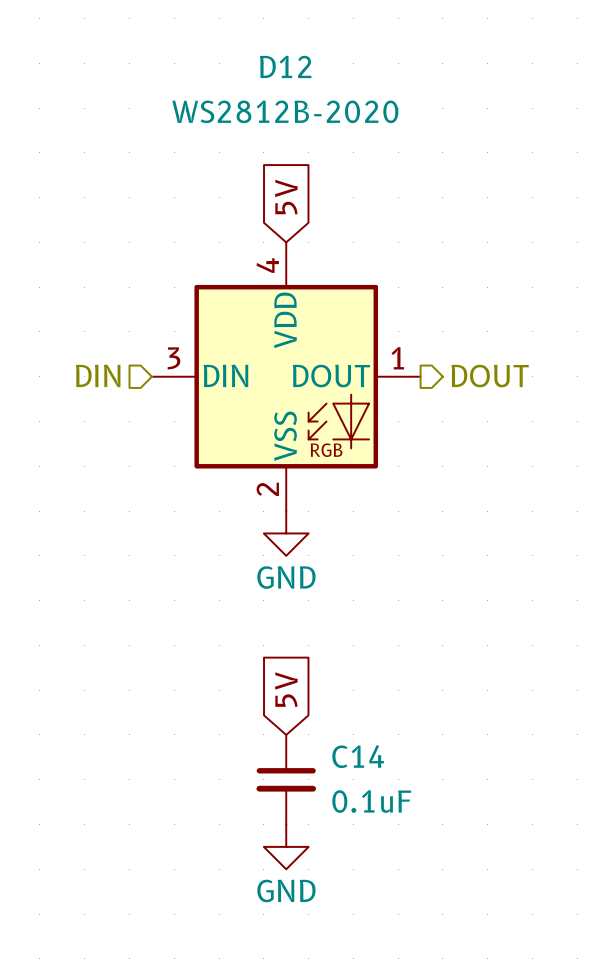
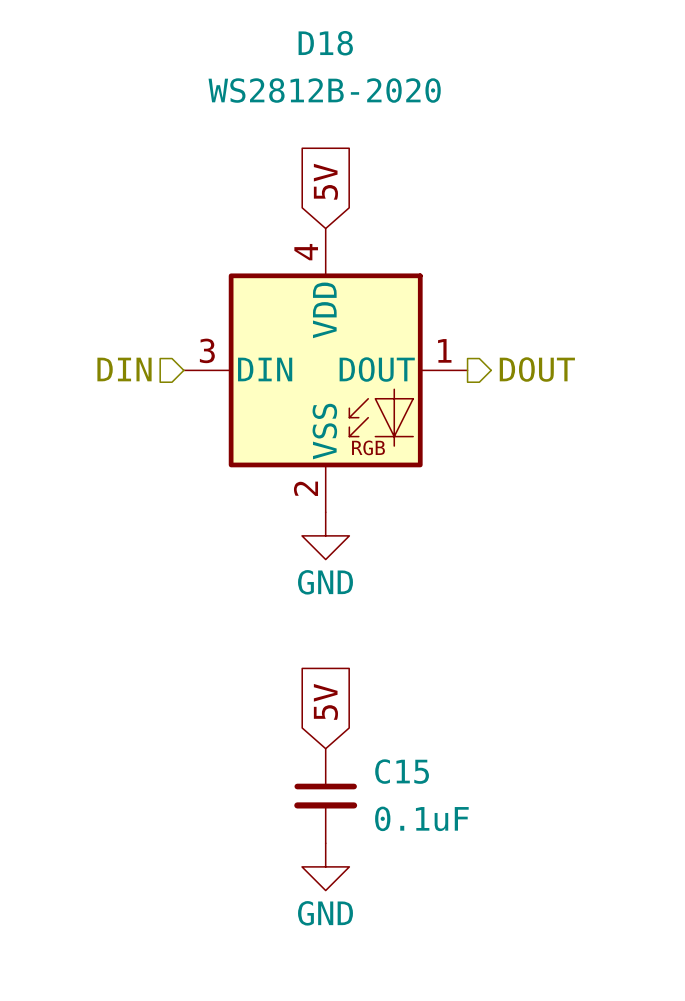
D12 name: D12 (285, 66) -> D18 (325, 43)
C14 name: C14 (358, 756) -> C15 (402, 771)

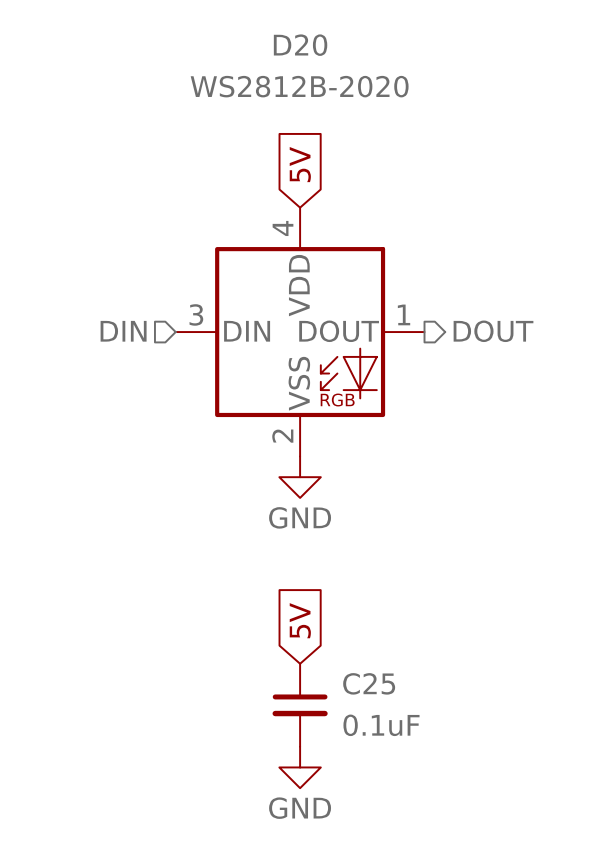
D18 name: D18 (325, 43) -> D20 (300, 45)
C15 name: C15 (402, 771) -> C25 (369, 683)

